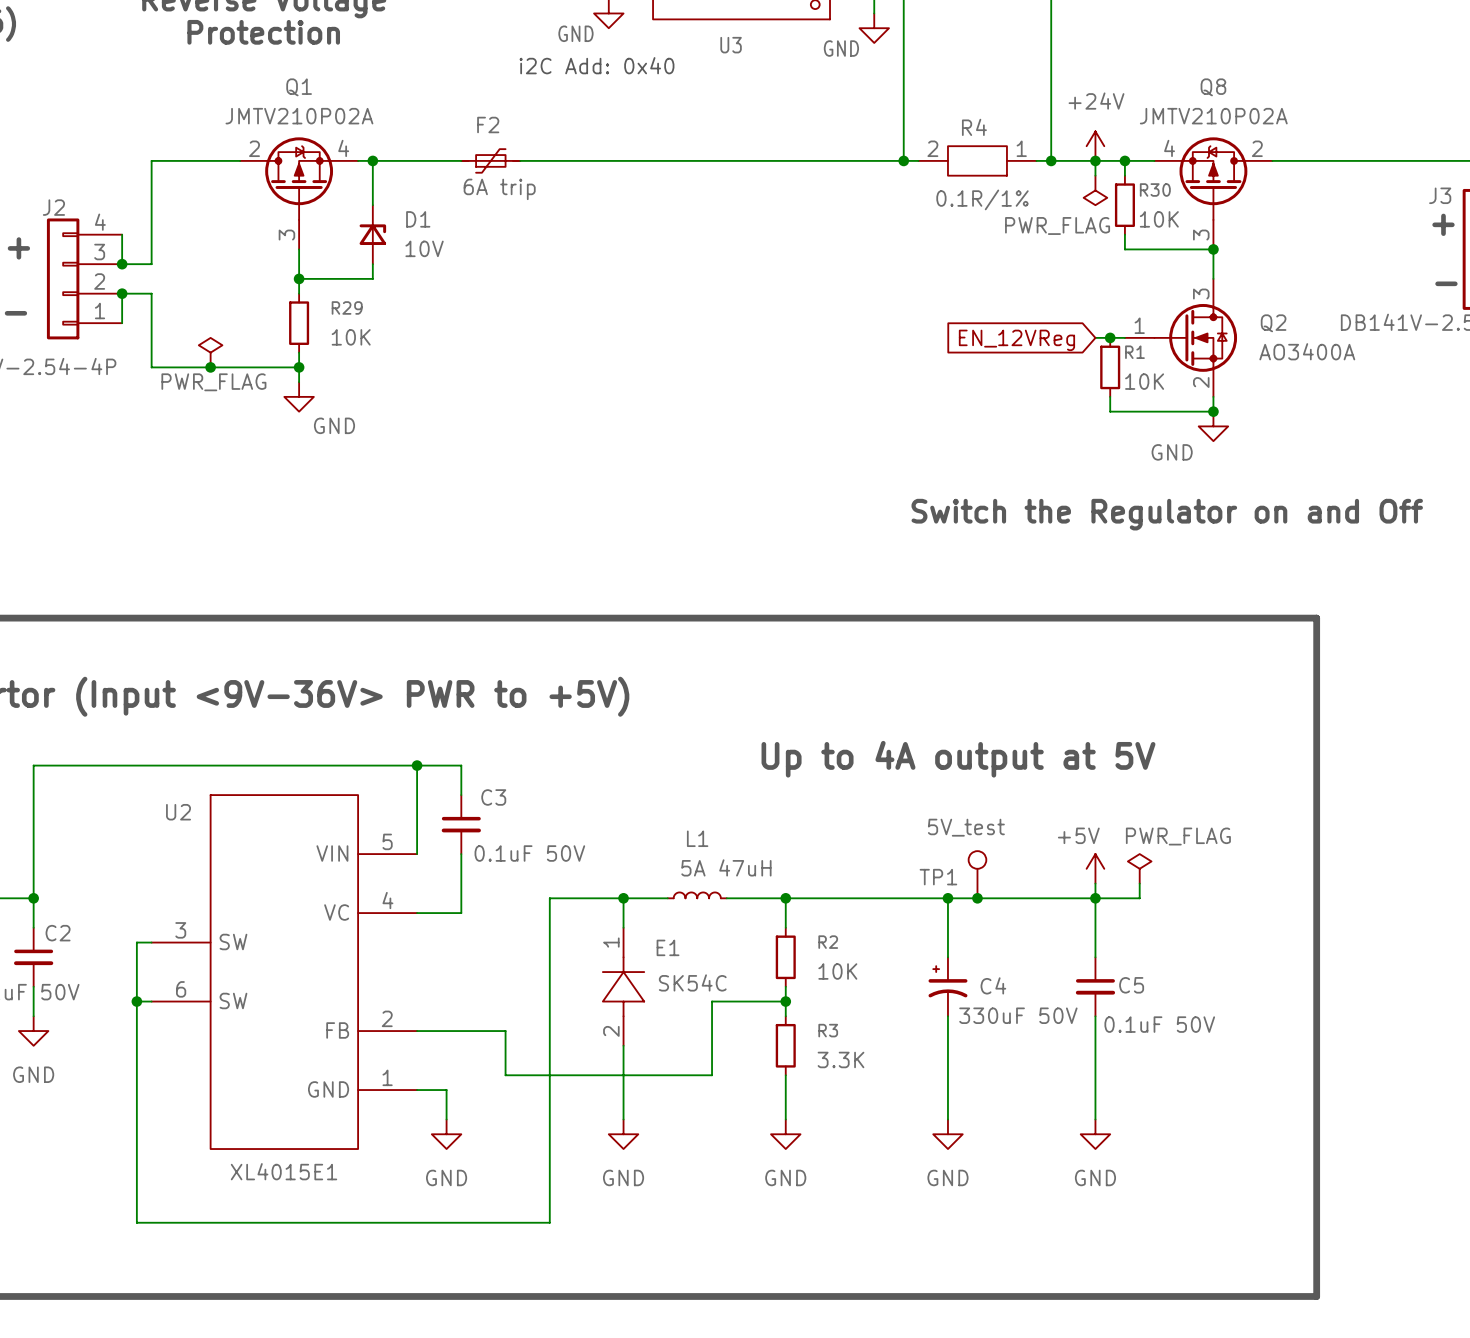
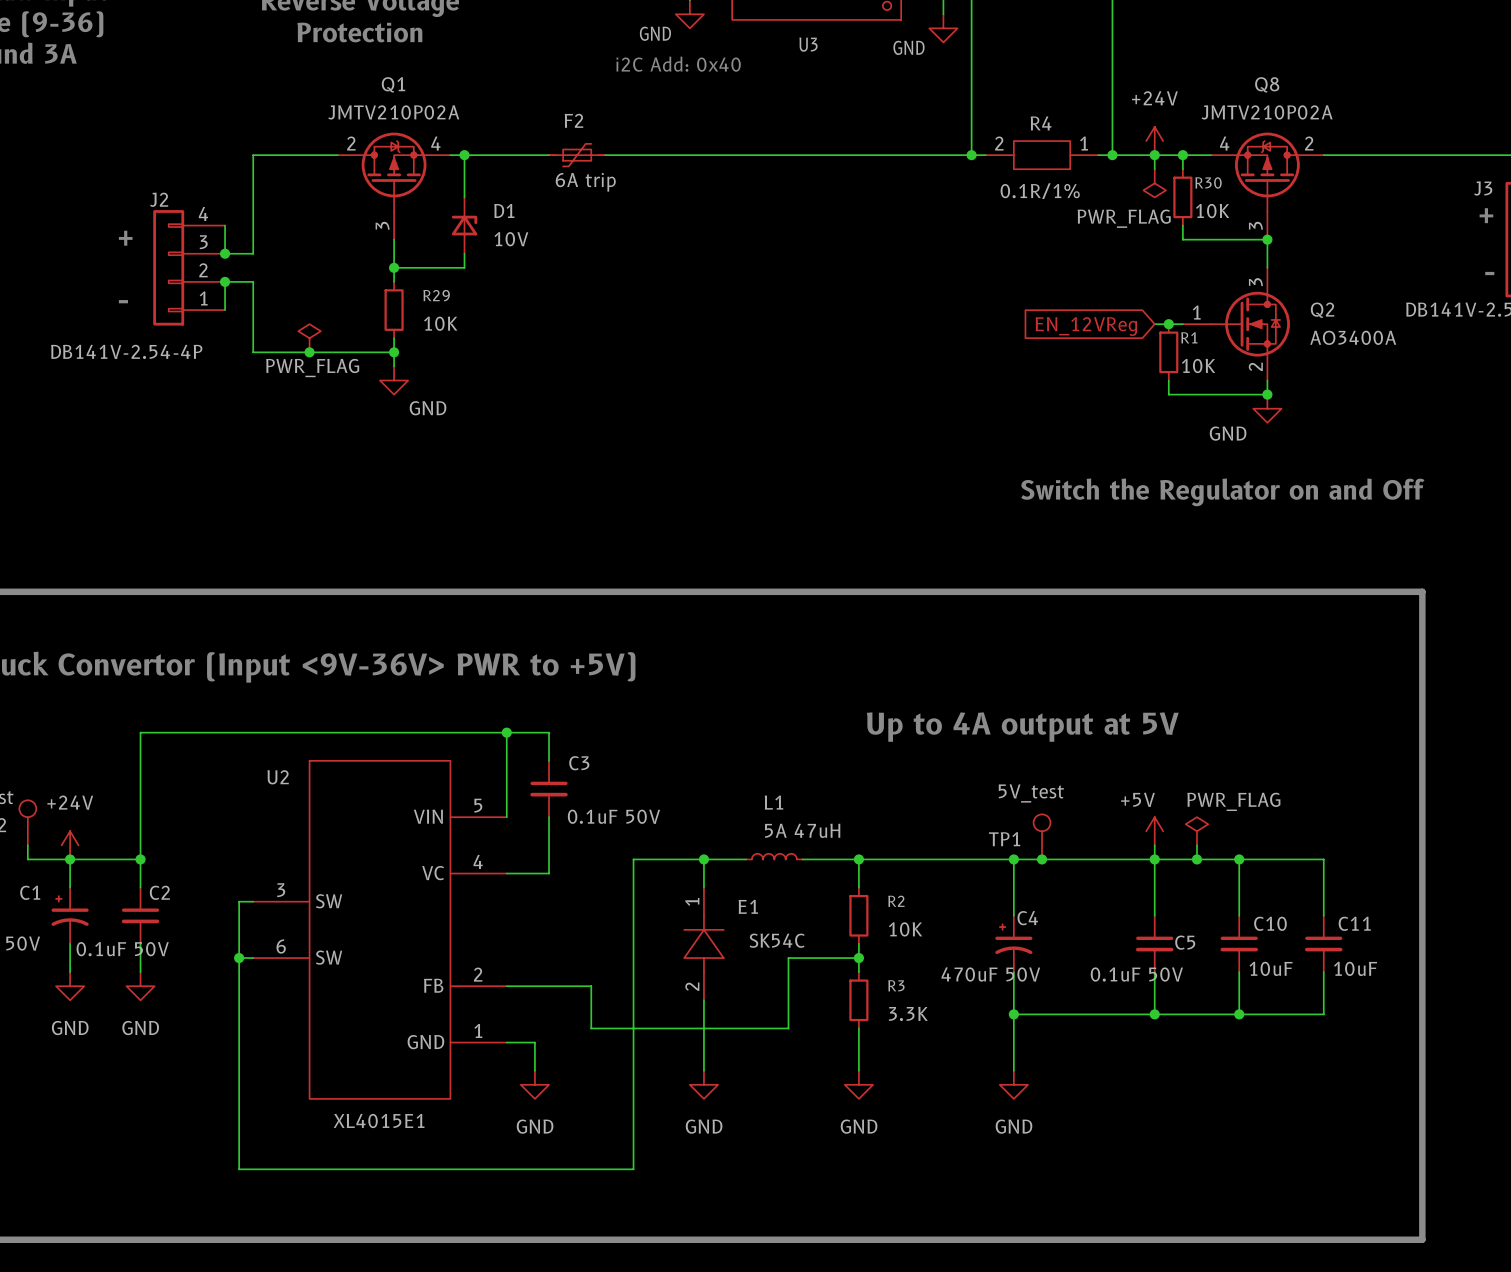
line: (1316, 618) (1316, 1296) -> (1366, 591) (1422, 591) (1422, 1239) (1366, 1239)
wire: none -> (1196, 859) (1323, 859) (1323, 915)
junction: none -> (1196, 859)
junction: none -> (1239, 859)
C4 name position: C4 (993, 985) -> C4 (1027, 918)
C10: none -> 10uF (1239, 943)
C11: none -> 10uF (1323, 943)
C4 value: 330uF 50V (1018, 1015) -> 470uF 50V (990, 974)
wire: none -> (1239, 972) (1239, 1014)
wire: none -> (1323, 972) (1323, 1014) (1013, 1014)
C5 value position: 0.1uF 50V (1159, 1024) -> 0.1uF 50V (1136, 974)
junction: none -> (1013, 1014)
wire: (1095, 1060) (1095, 1119) -> (1239, 859) (1239, 915)
junction: none -> (1154, 1014)
junction: none -> (1239, 1014)
power symbol: GND (1095, 1134) -> none

